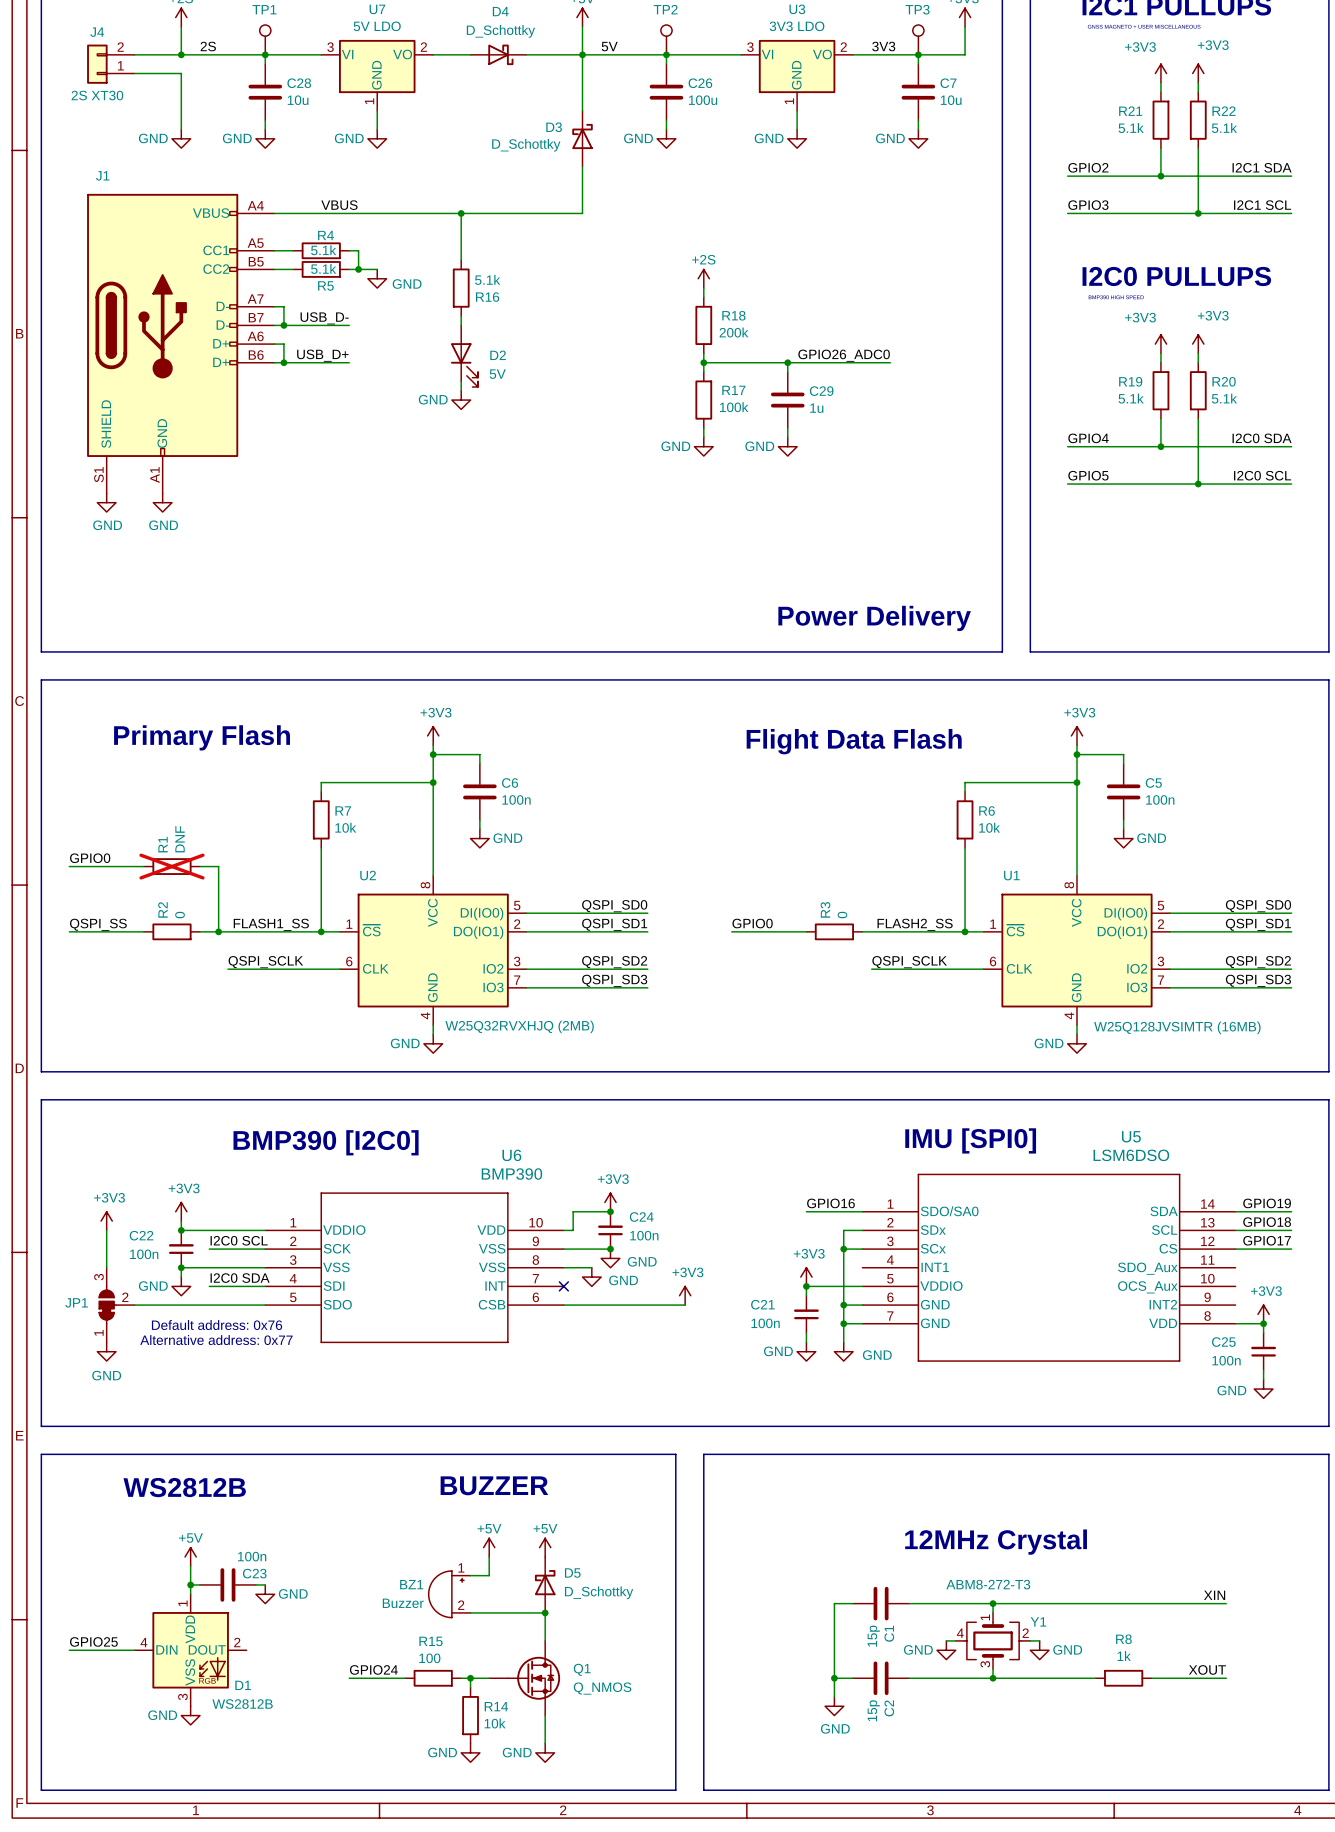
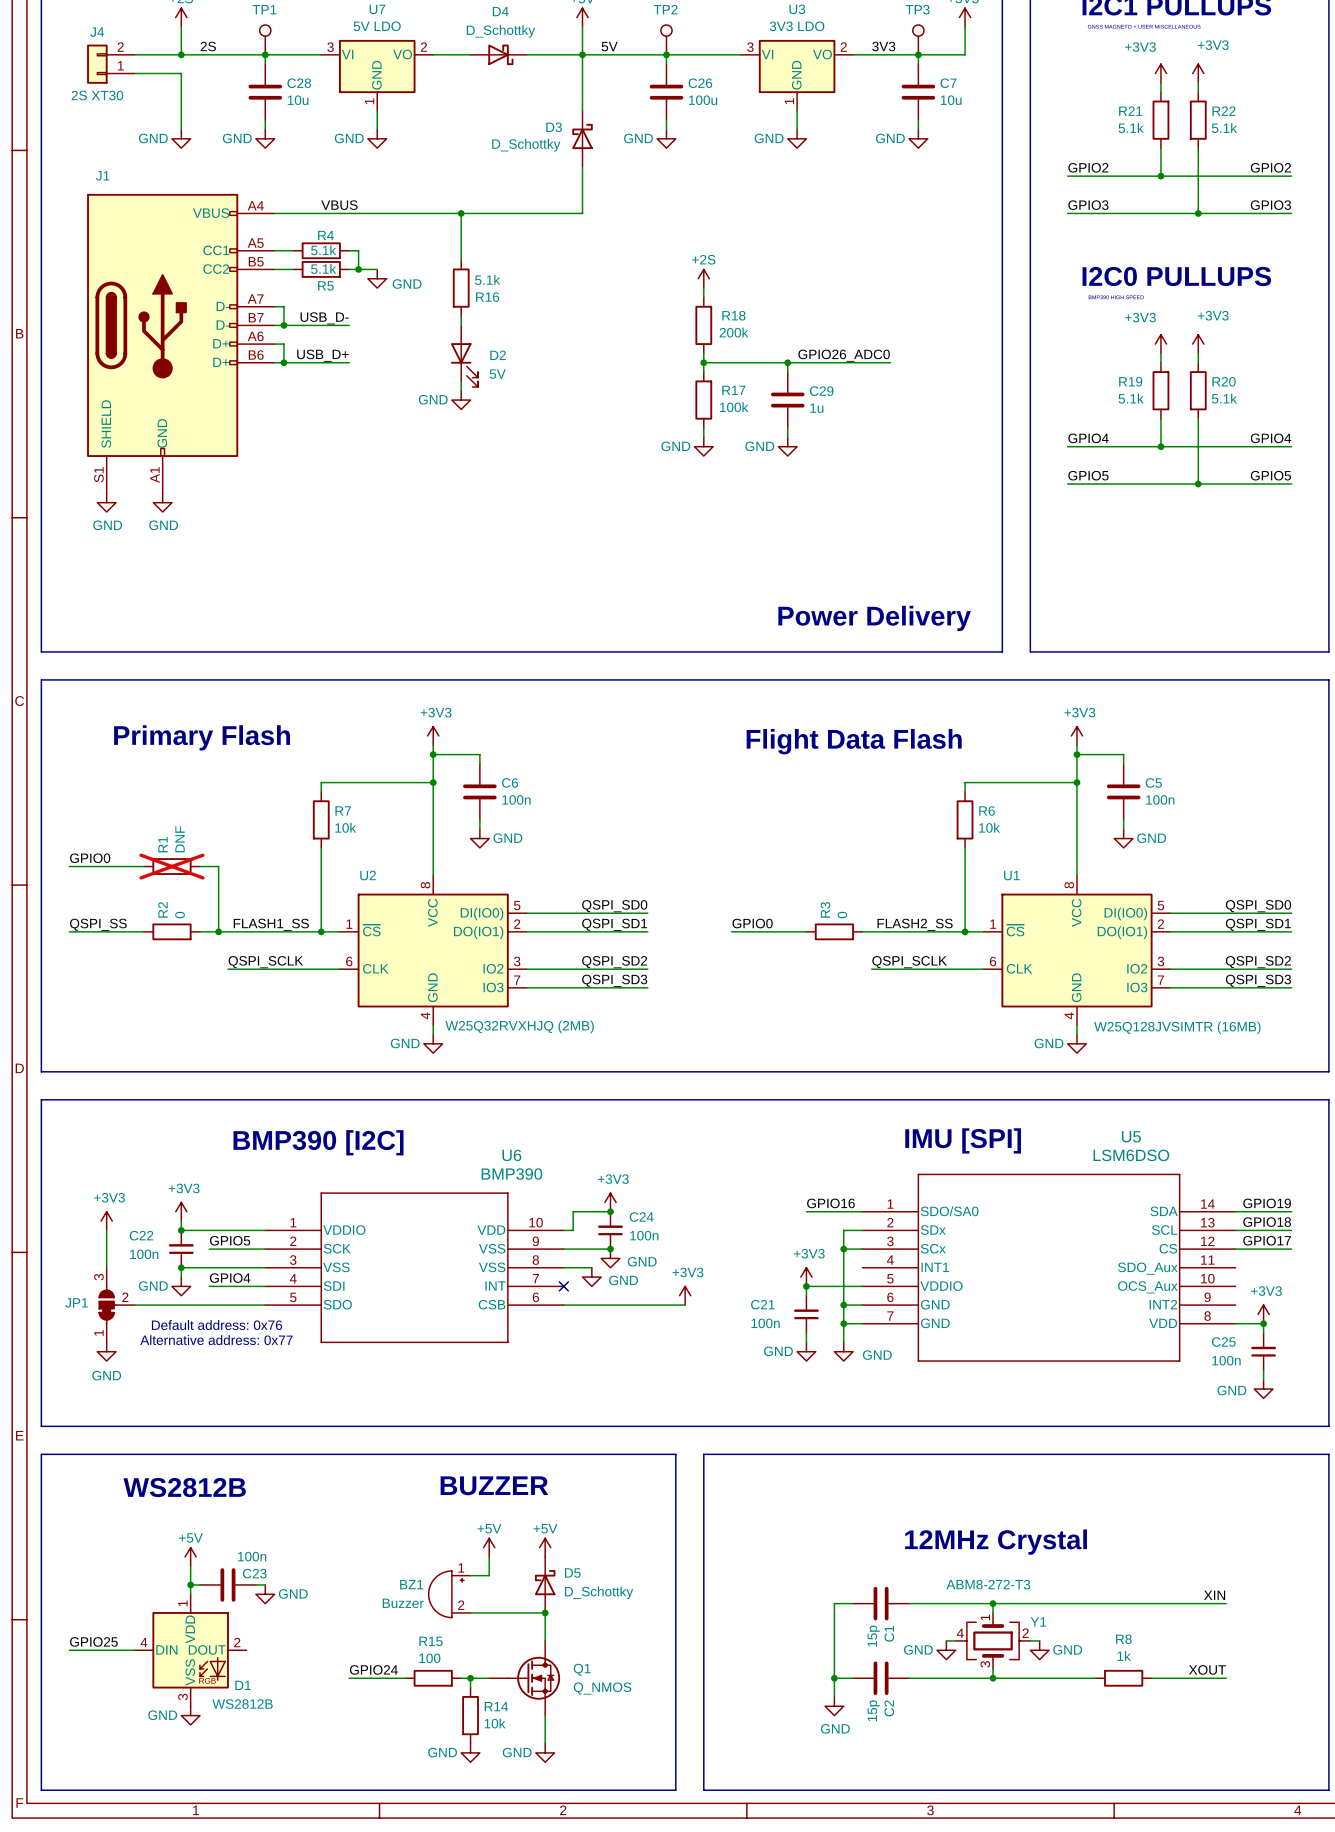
label: I2C1 SDA (1262, 167) -> GPIO2 (1270, 167)
label: I2C1 SCL (1262, 205) -> GPIO3 (1270, 205)
label: I2C0 SDA (1262, 438) -> GPIO4 (1270, 438)
label: I2C0 SCL (1262, 475) -> GPIO5 (1270, 475)
text: IMU [SPI0] (970, 1140) -> IMU [SPI] (963, 1140)
text: BMP390 [I2C0] (326, 1142) -> BMP390 [I2C] (318, 1142)
label: I2C0 SCL (239, 1240) -> GPIO5 (230, 1240)
label: I2C0 SDA (240, 1278) -> GPIO4 (230, 1278)

